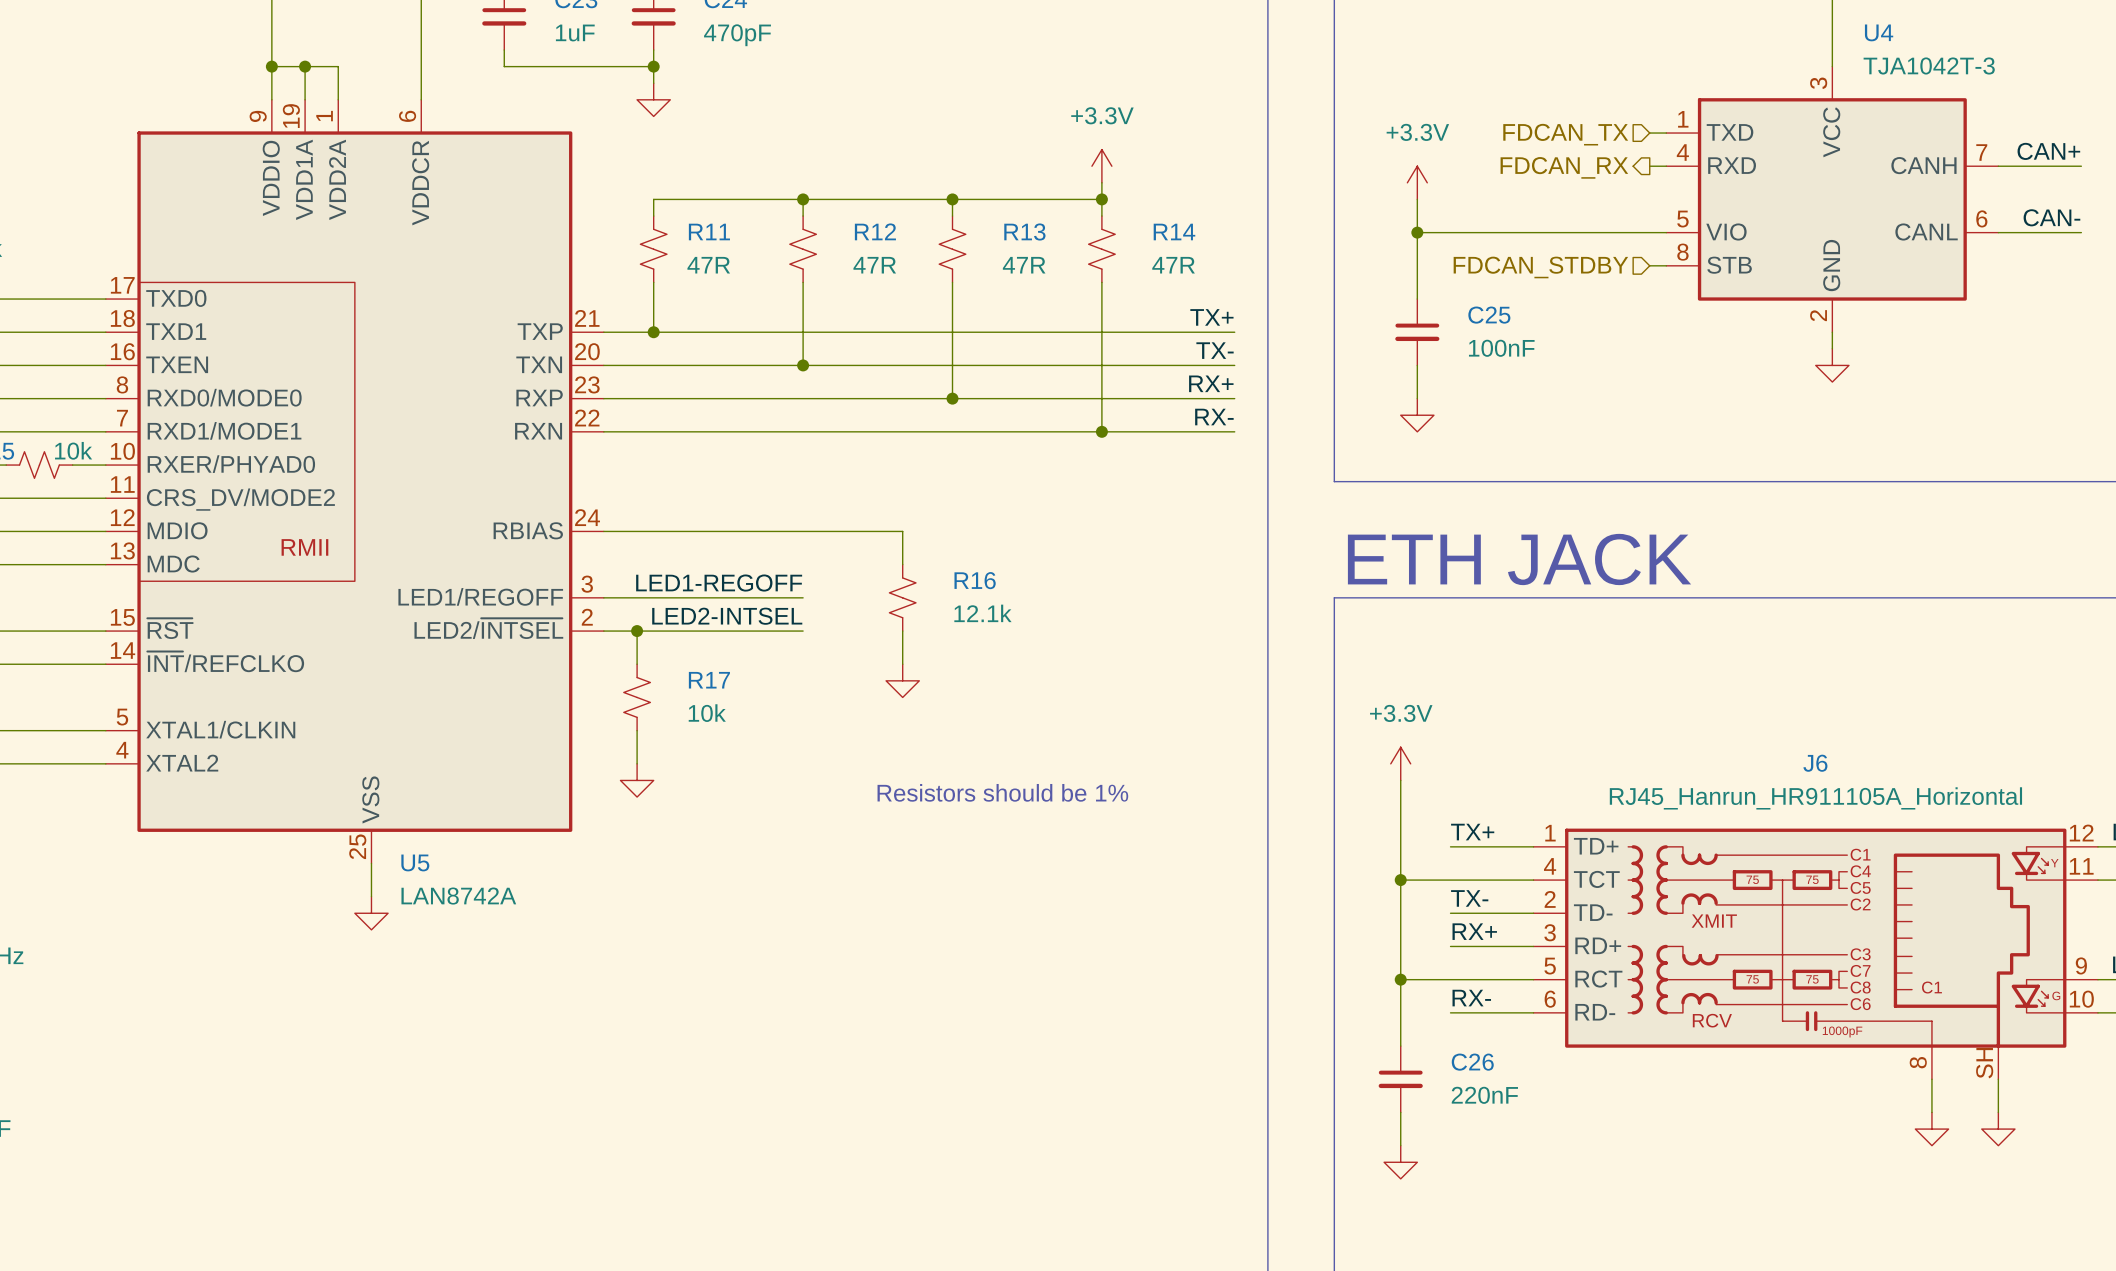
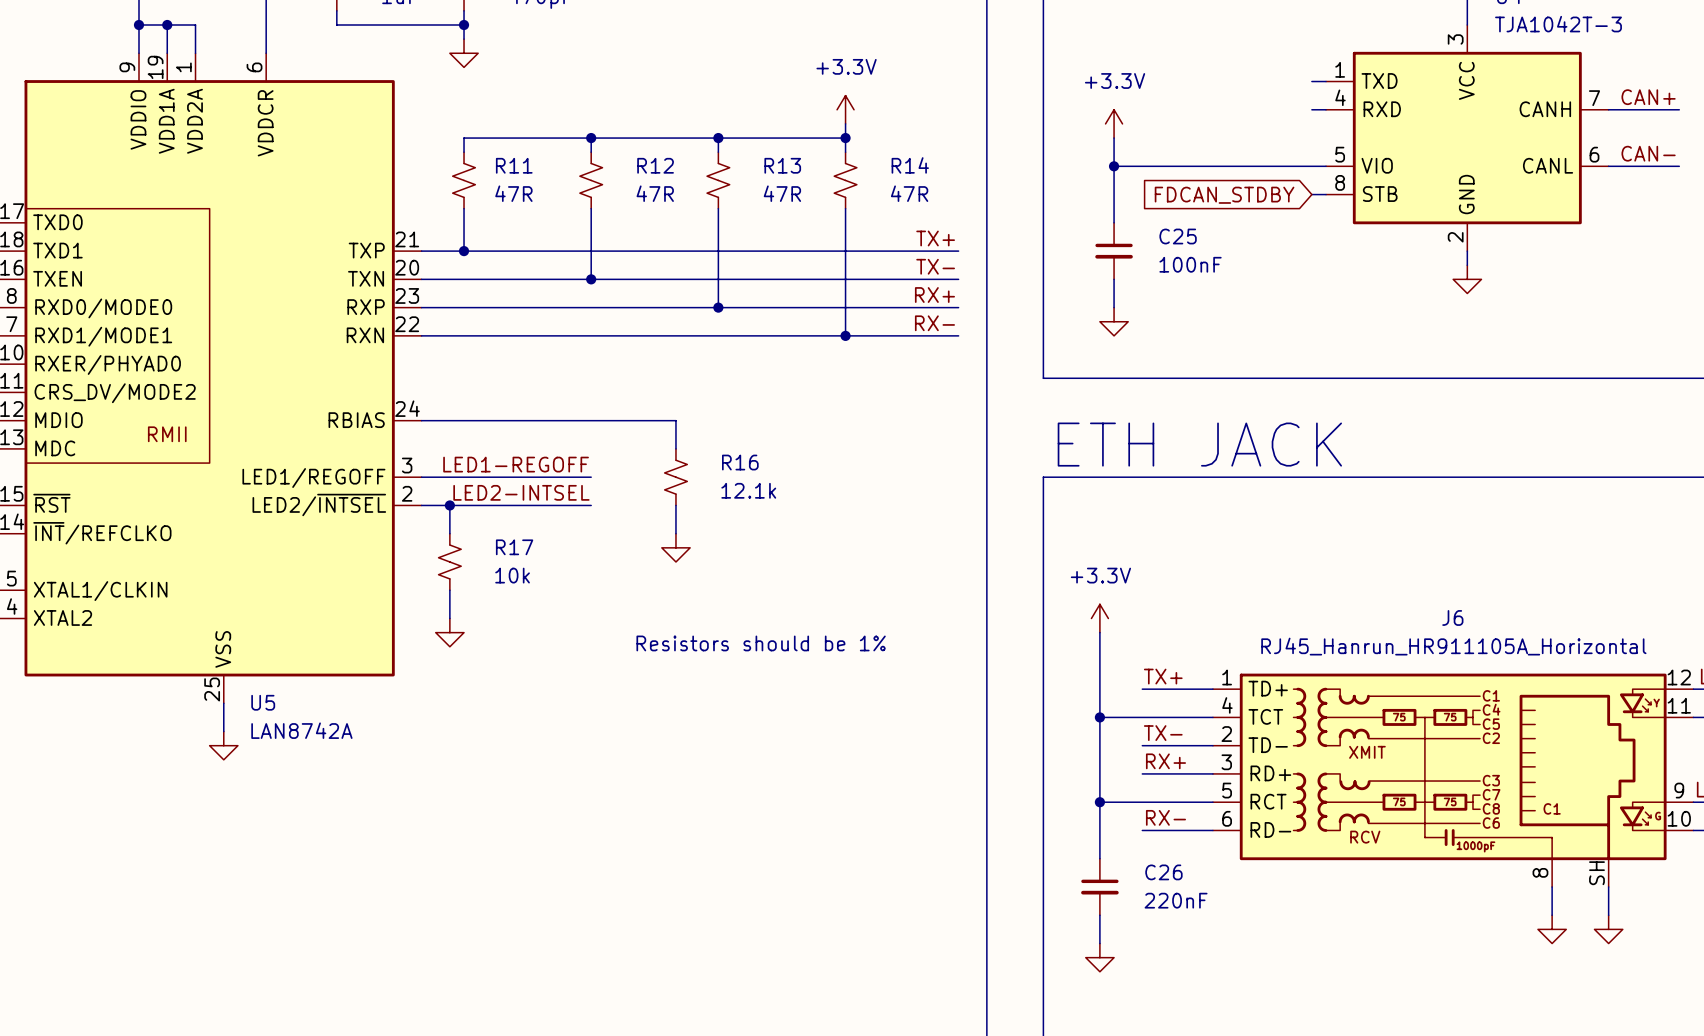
hierarchical label: FDCAN_TX (1565, 134) -> none
hierarchical label: FDCAN_RX (1564, 167) -> none
hierarchical label: FDCAN_STDBY (1540, 267) -> none
global label: none -> FDCAN_STDBY (1224, 195)

